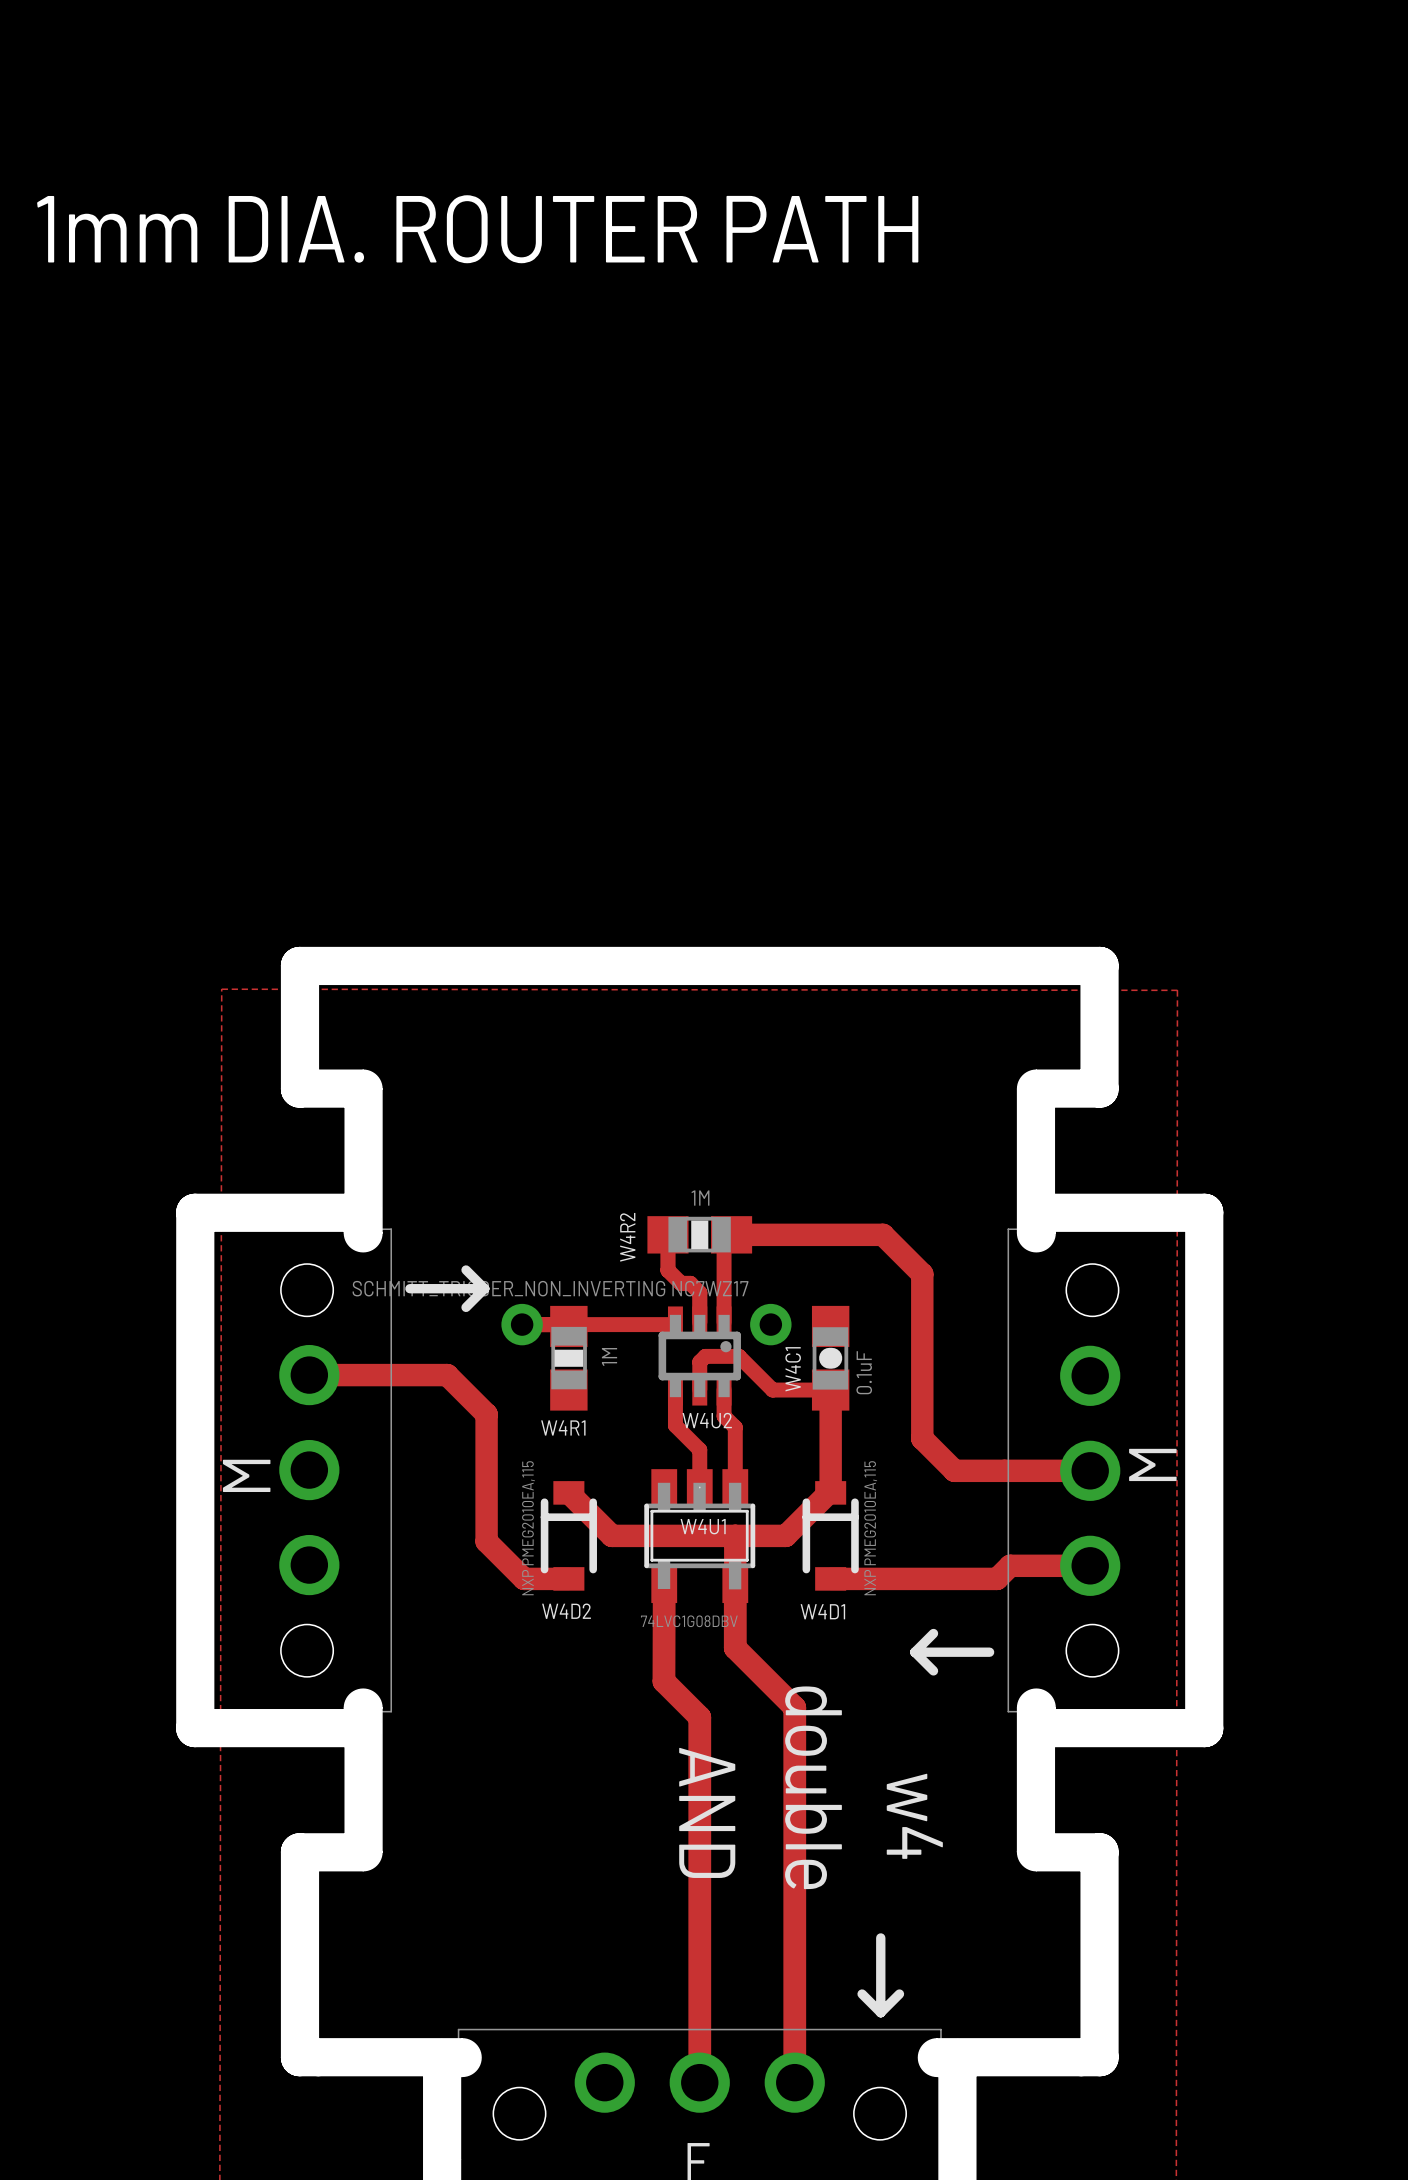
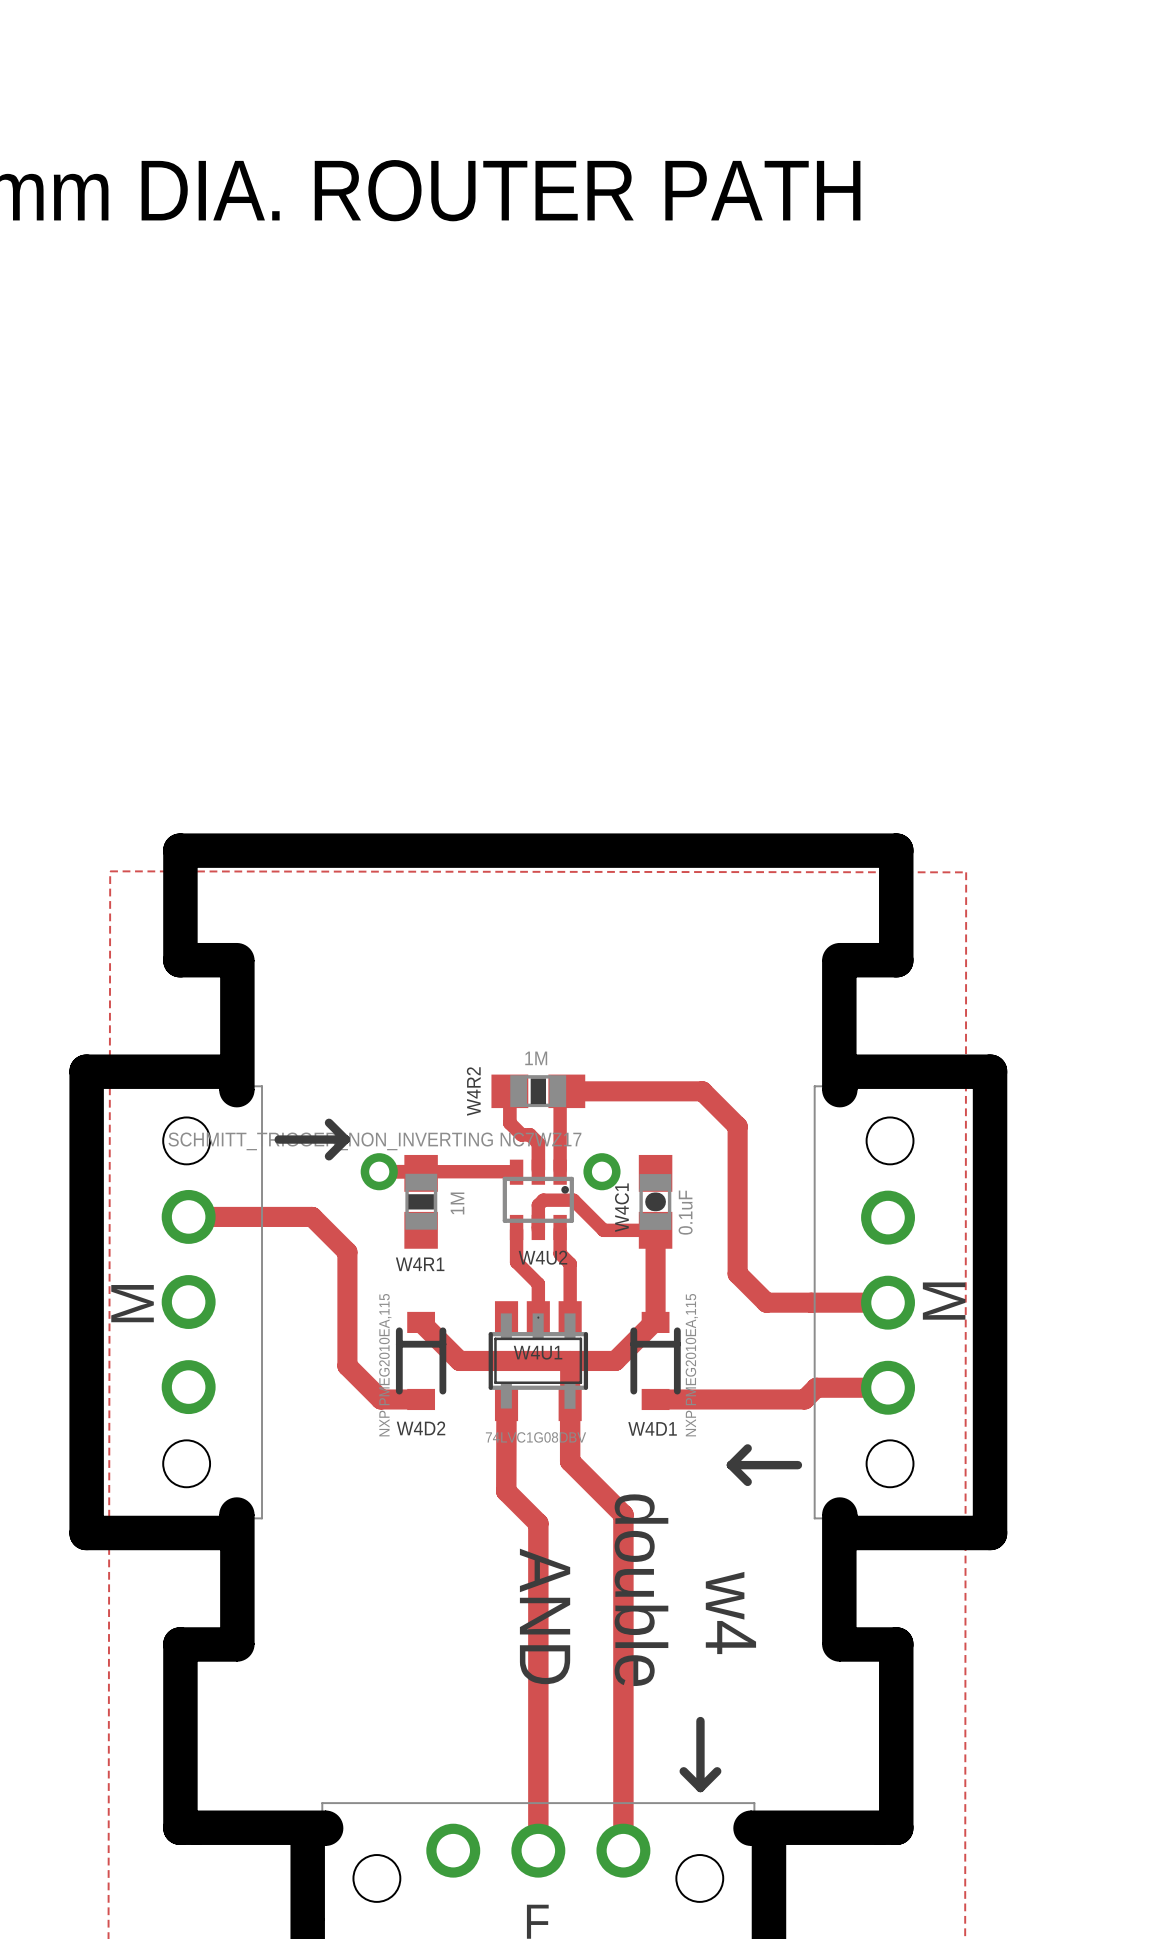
W4U2 footprint: [658, 1306, 741, 1406] -> [502, 1159, 574, 1241]

